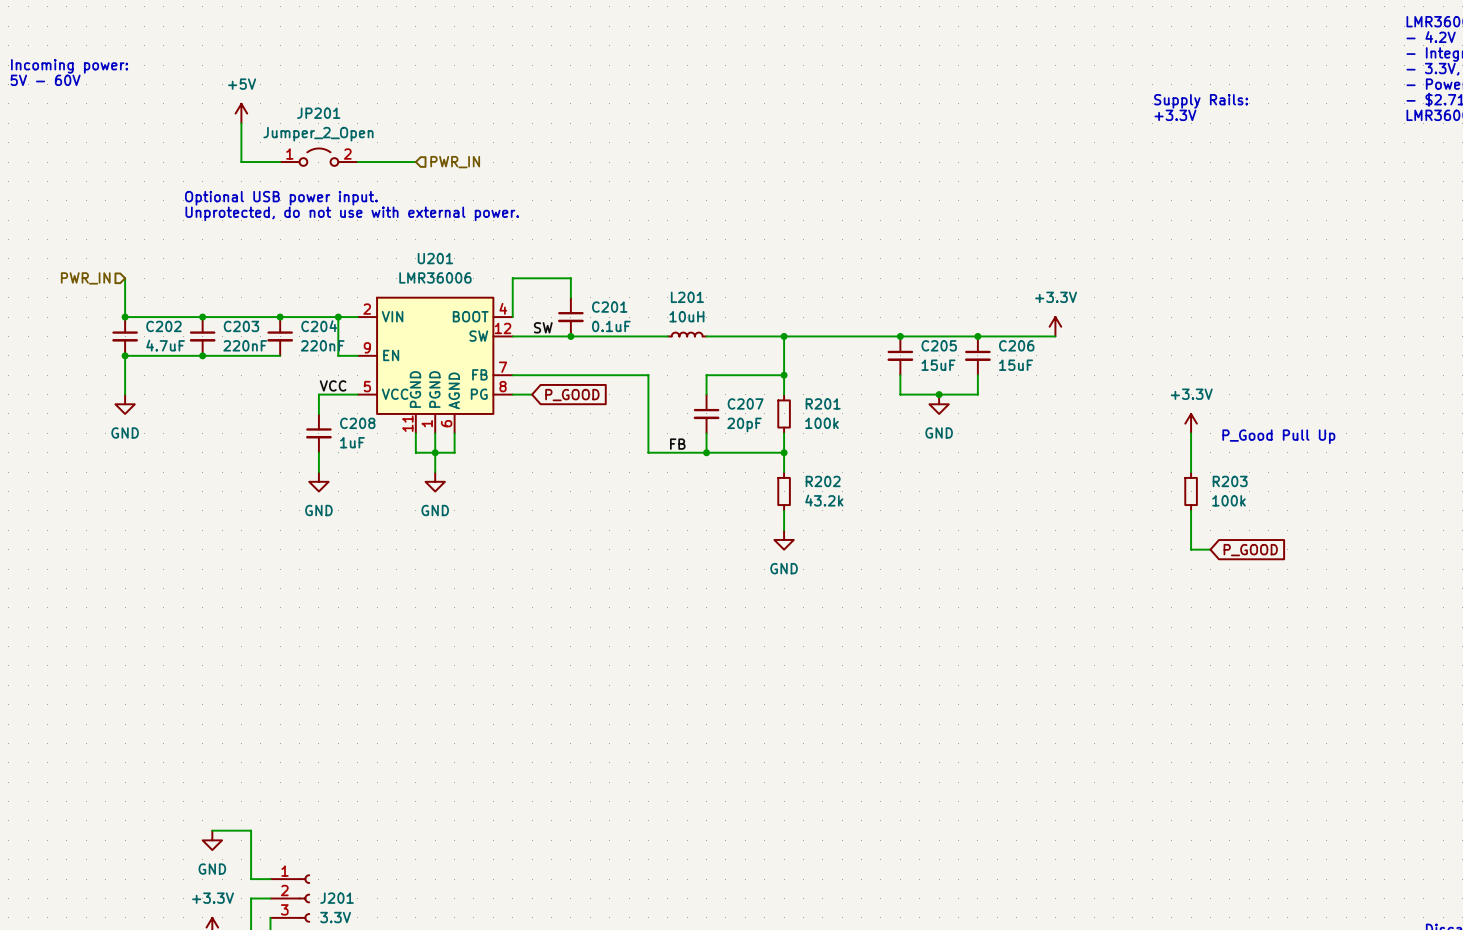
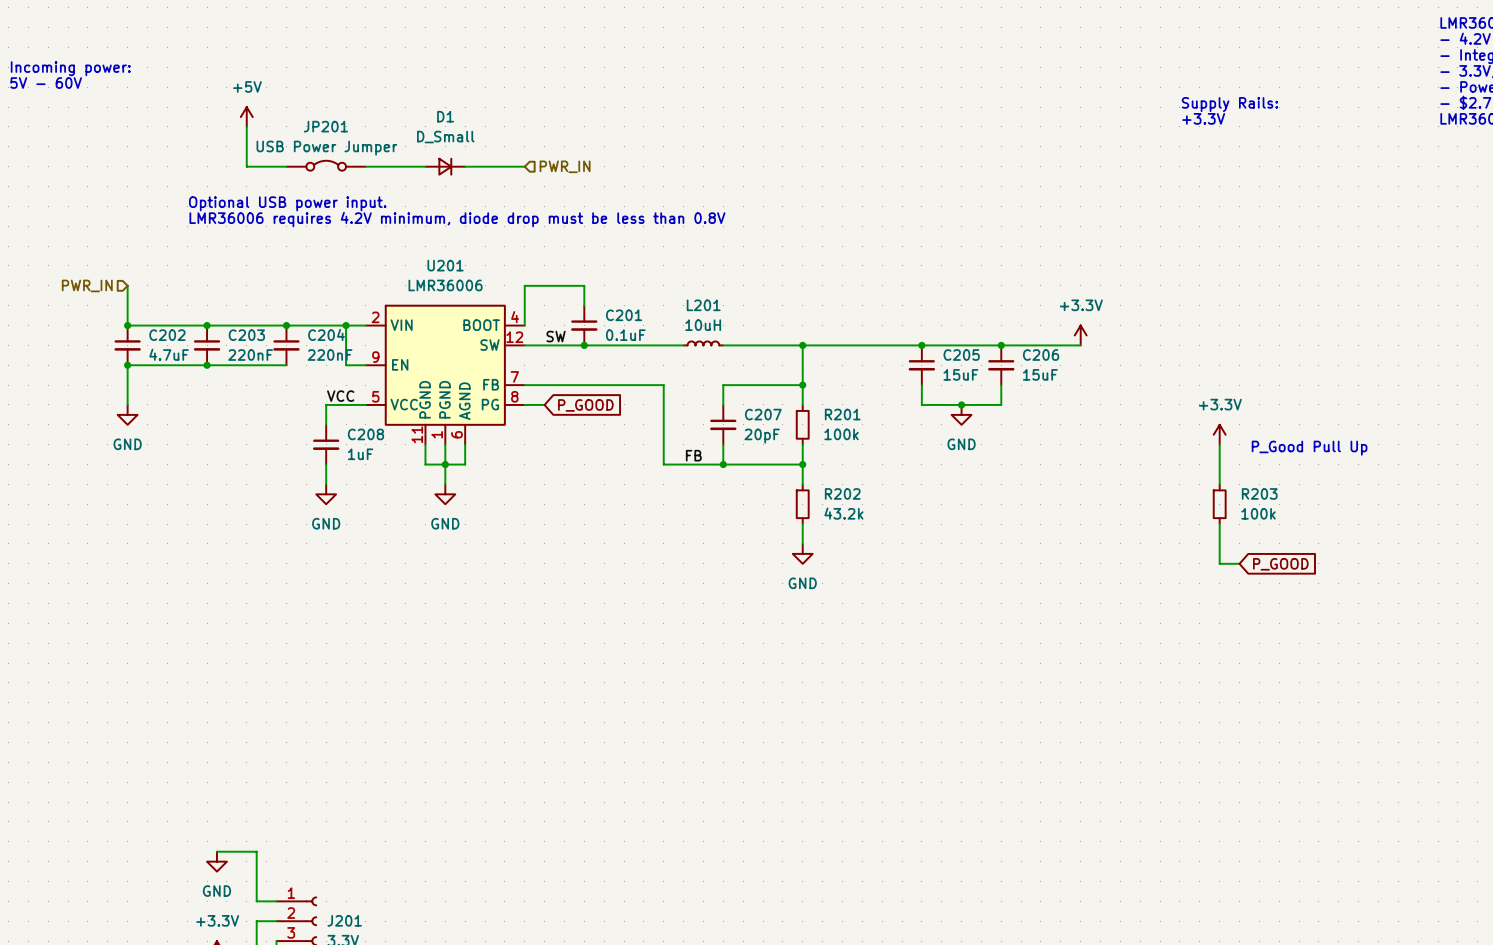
JP201 value: Jumper_2_Open (318, 134) -> USB Power Jumper (326, 148)
JP201 symbol: [280, 148, 358, 166] -> [286, 160, 366, 171]
D1: none -> D_Small (445, 166)
wire: none -> (465, 166) (524, 166)
hierarchical label position: PWR_IN (455, 162) -> PWR_IN (565, 166)
text: Unprotected, do not use with external power. (352, 213) -> LMR36006 requires 4.2V minimum, diode drop must be less than 0.8V (457, 219)

